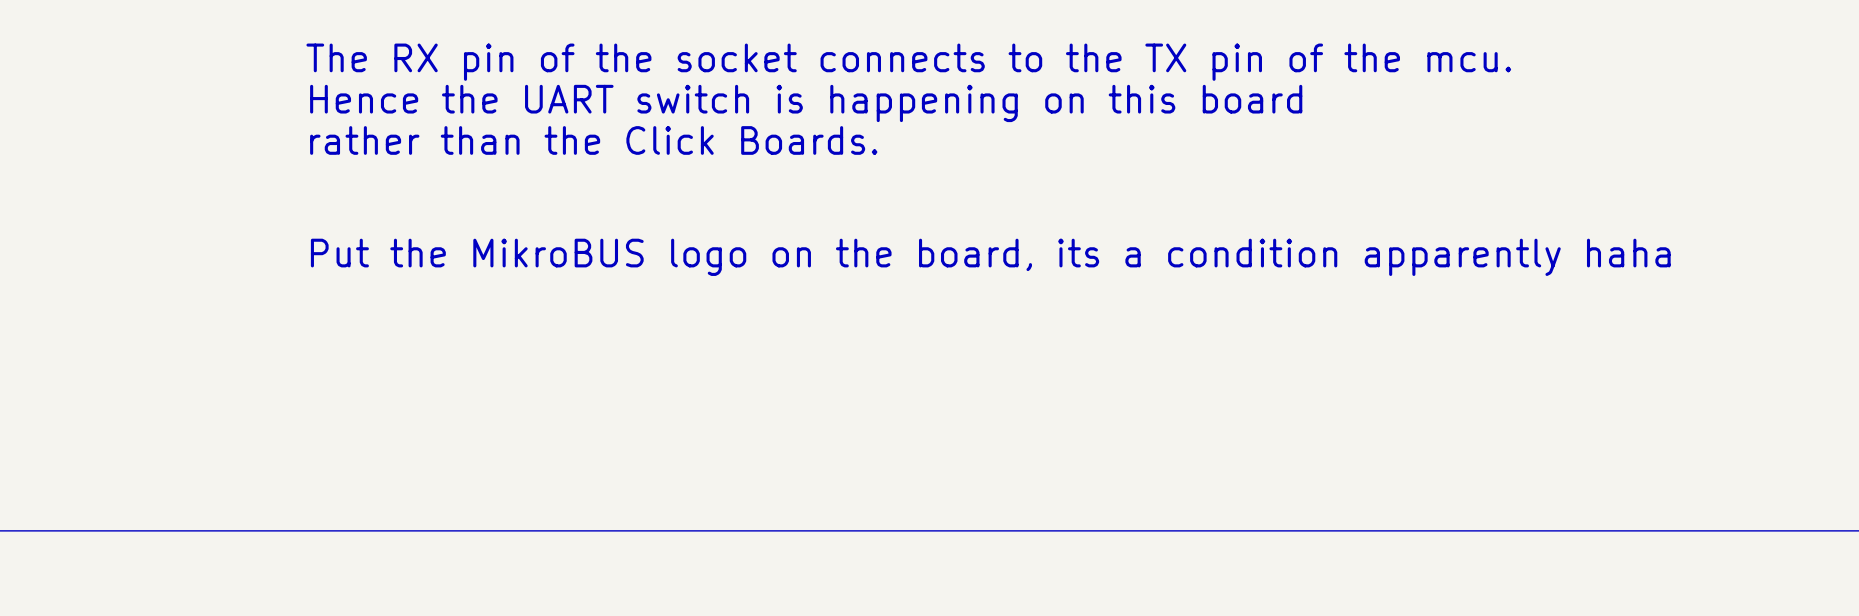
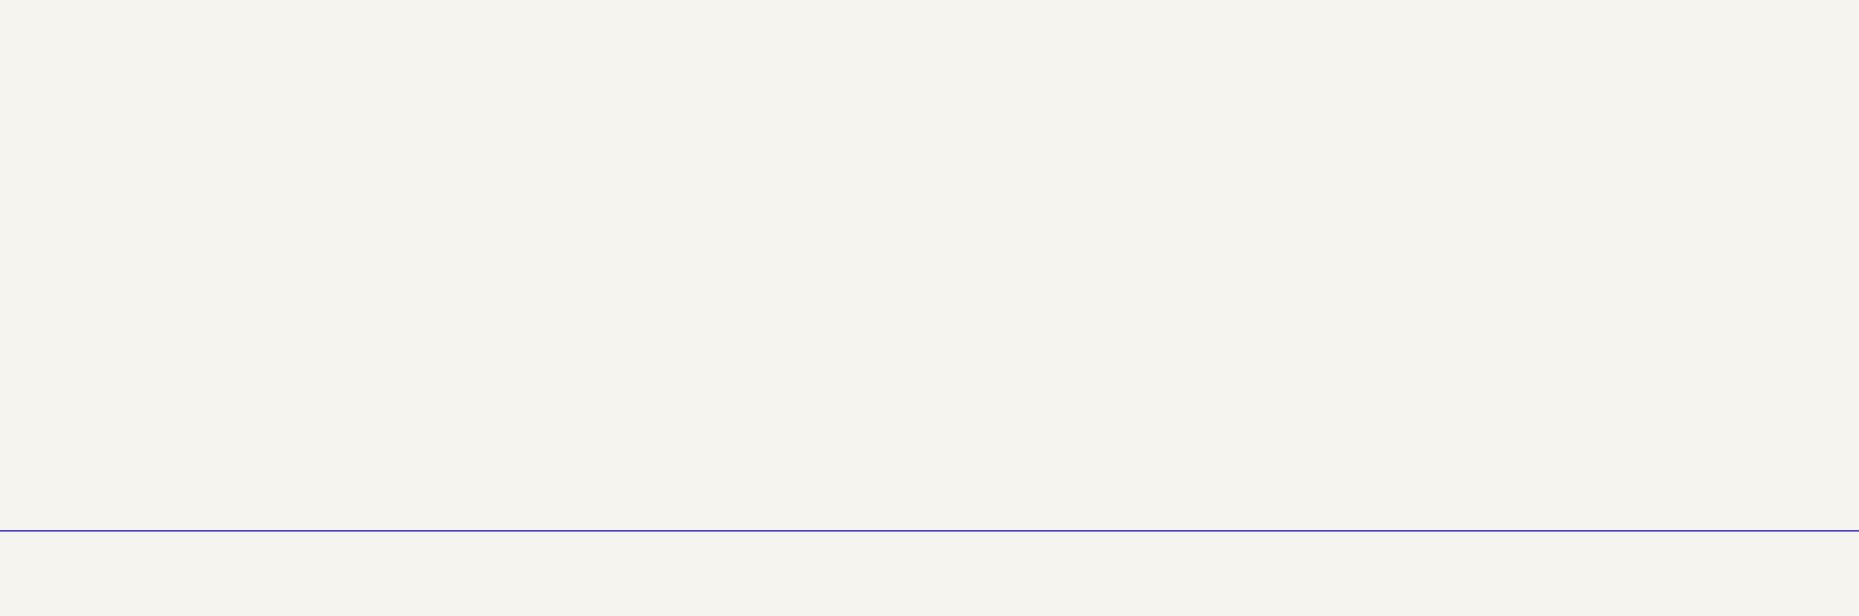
text: The RX pin of the socket connects to the TX pin of the mcu. (908, 62) -> none
text: Hence the UART switch is happening on this board (806, 103) -> none
text: rather than the Click Boards. (593, 140) -> none
text: Put the MikroBUS logo on the board, its a condition apparently haha (990, 257) -> none

